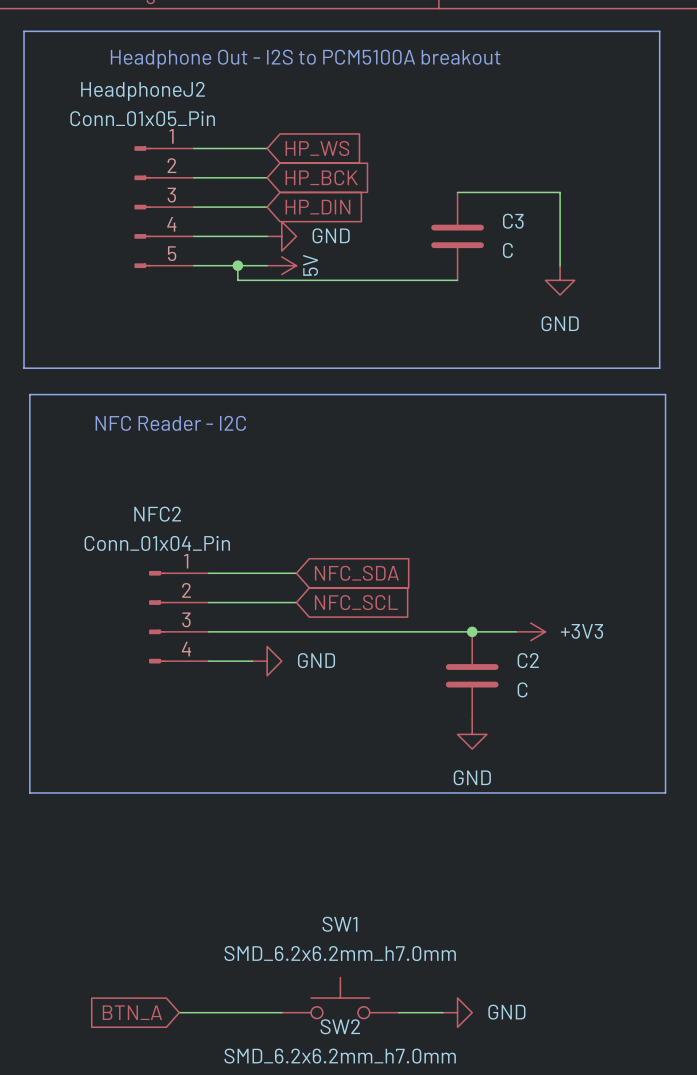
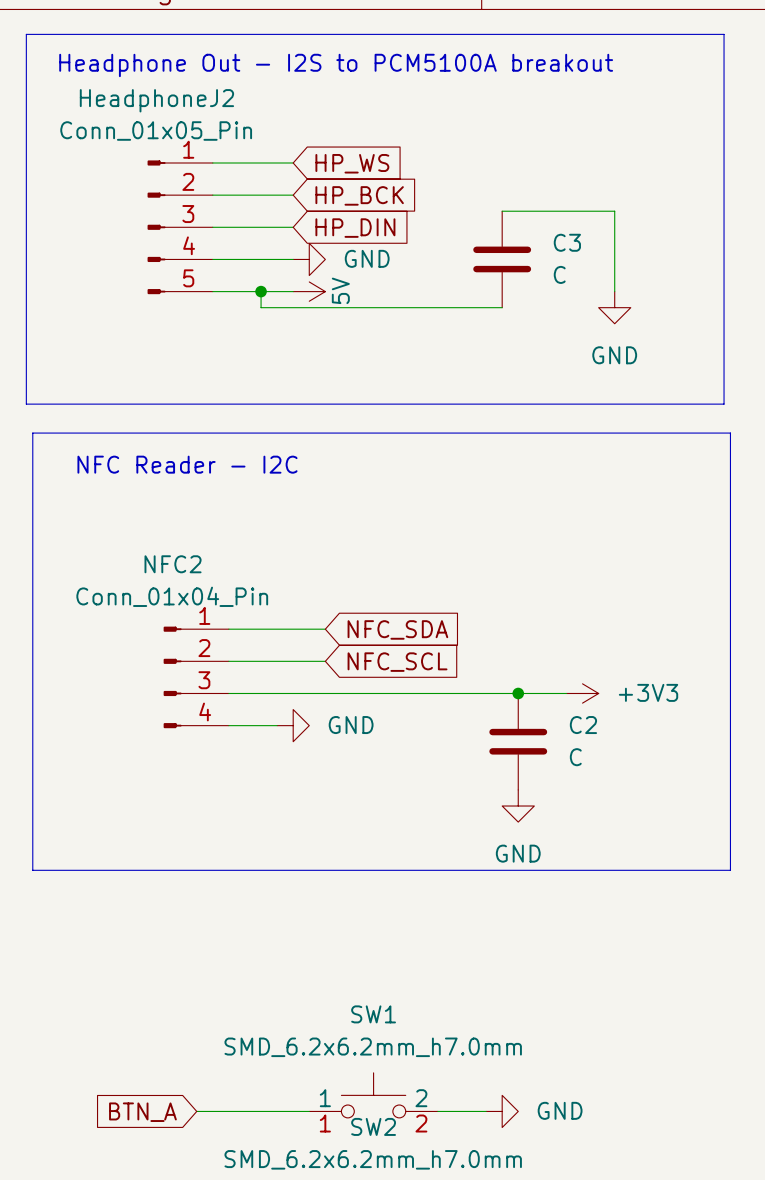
SW1 pin name: none -> 1 (325, 1098)
SW1 pin name: none -> 2 (421, 1098)
SW1 pin number: none -> 1 (325, 1123)
SW1 pin number: none -> 2 (421, 1123)

